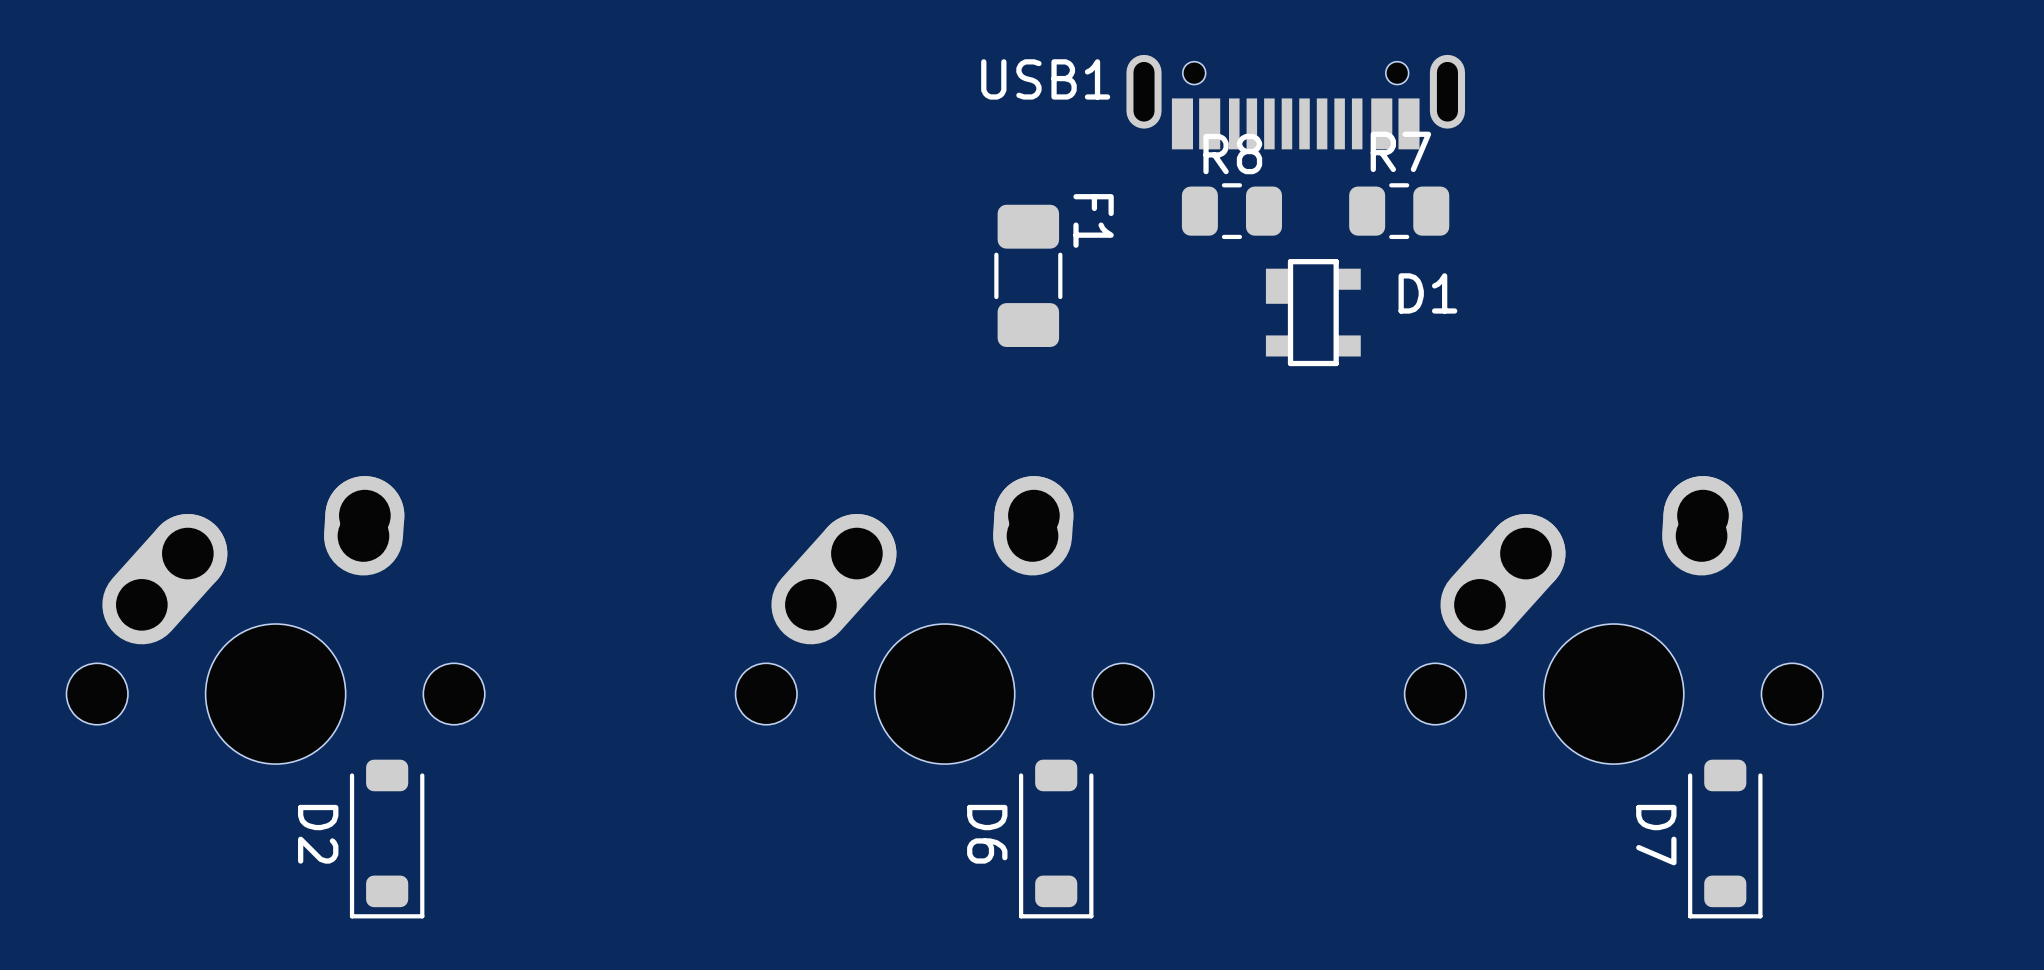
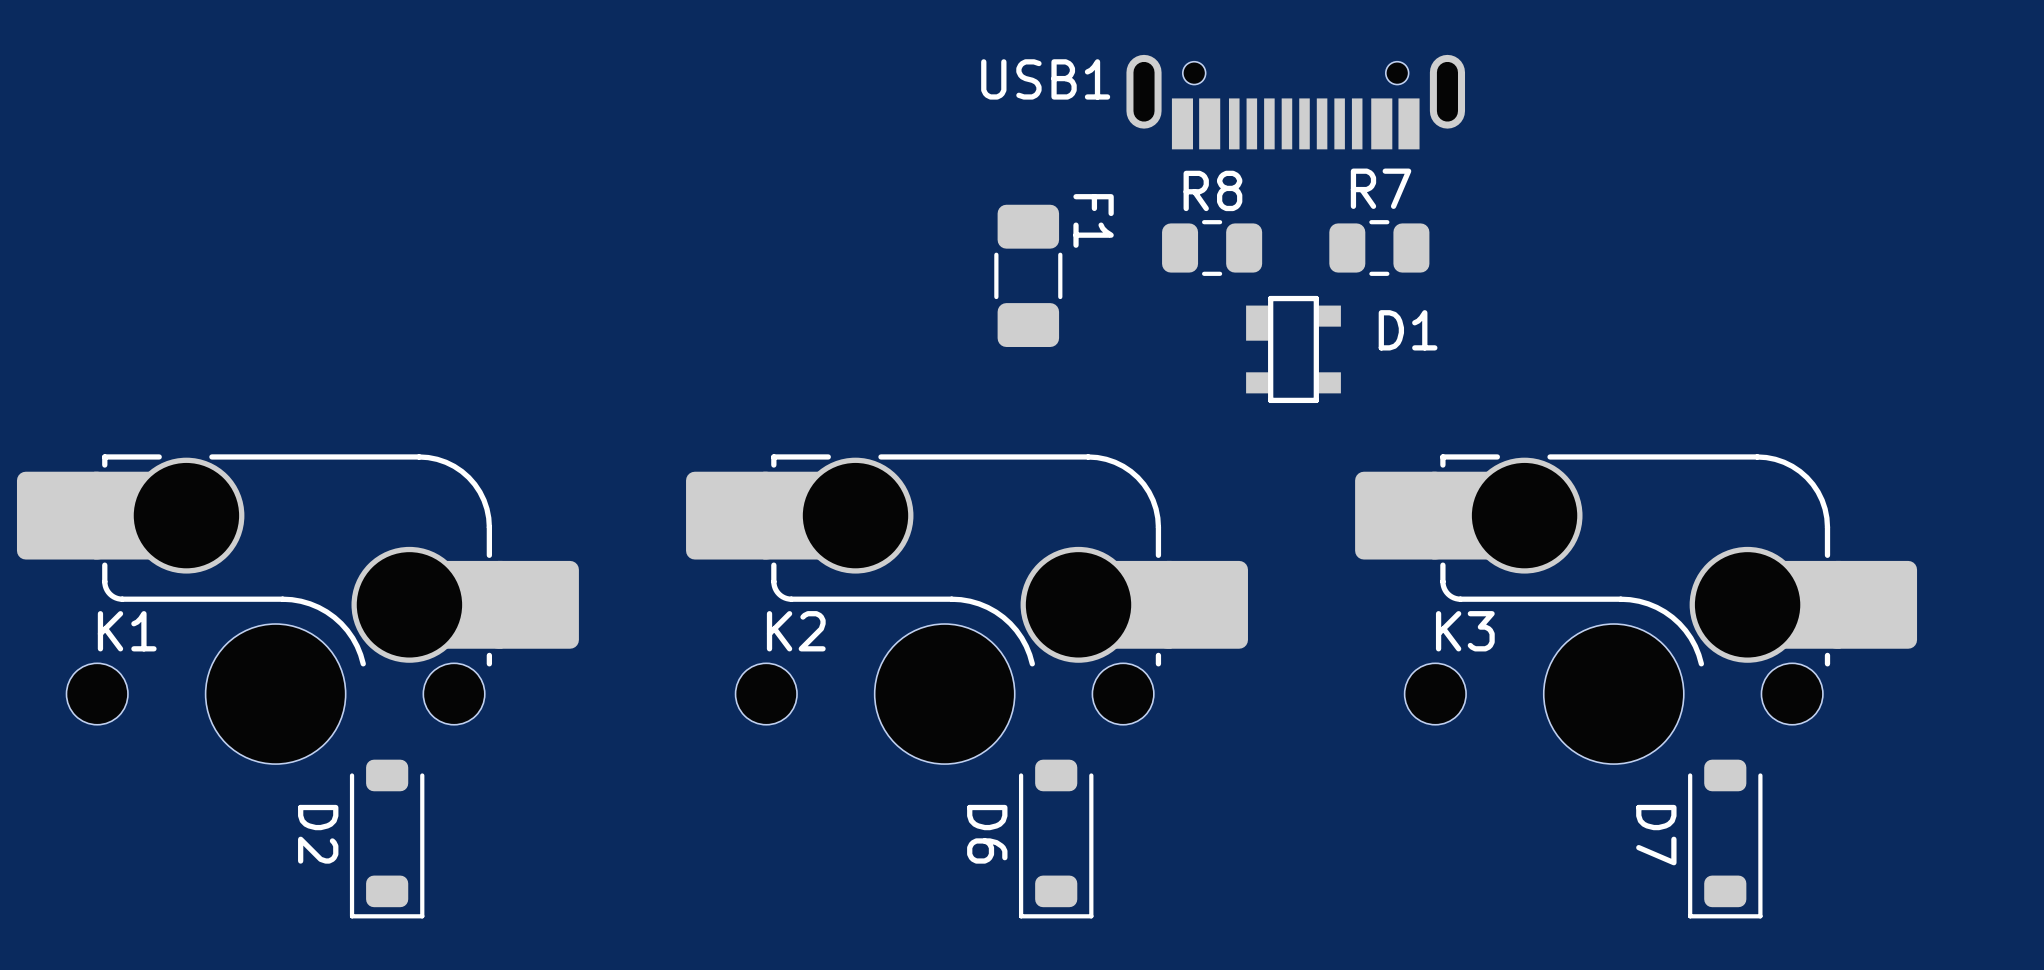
R8 position: (1231, 211) -> (1212, 247)
R7 position: (1399, 211) -> (1379, 247)
D1 position: (1313, 312) -> (1293, 349)
K1: none -> (297, 609)
K2: none -> (967, 609)
K3: none -> (1636, 609)
part: (275, 620) -> none
part: (944, 620) -> none
part: (1613, 620) -> none

